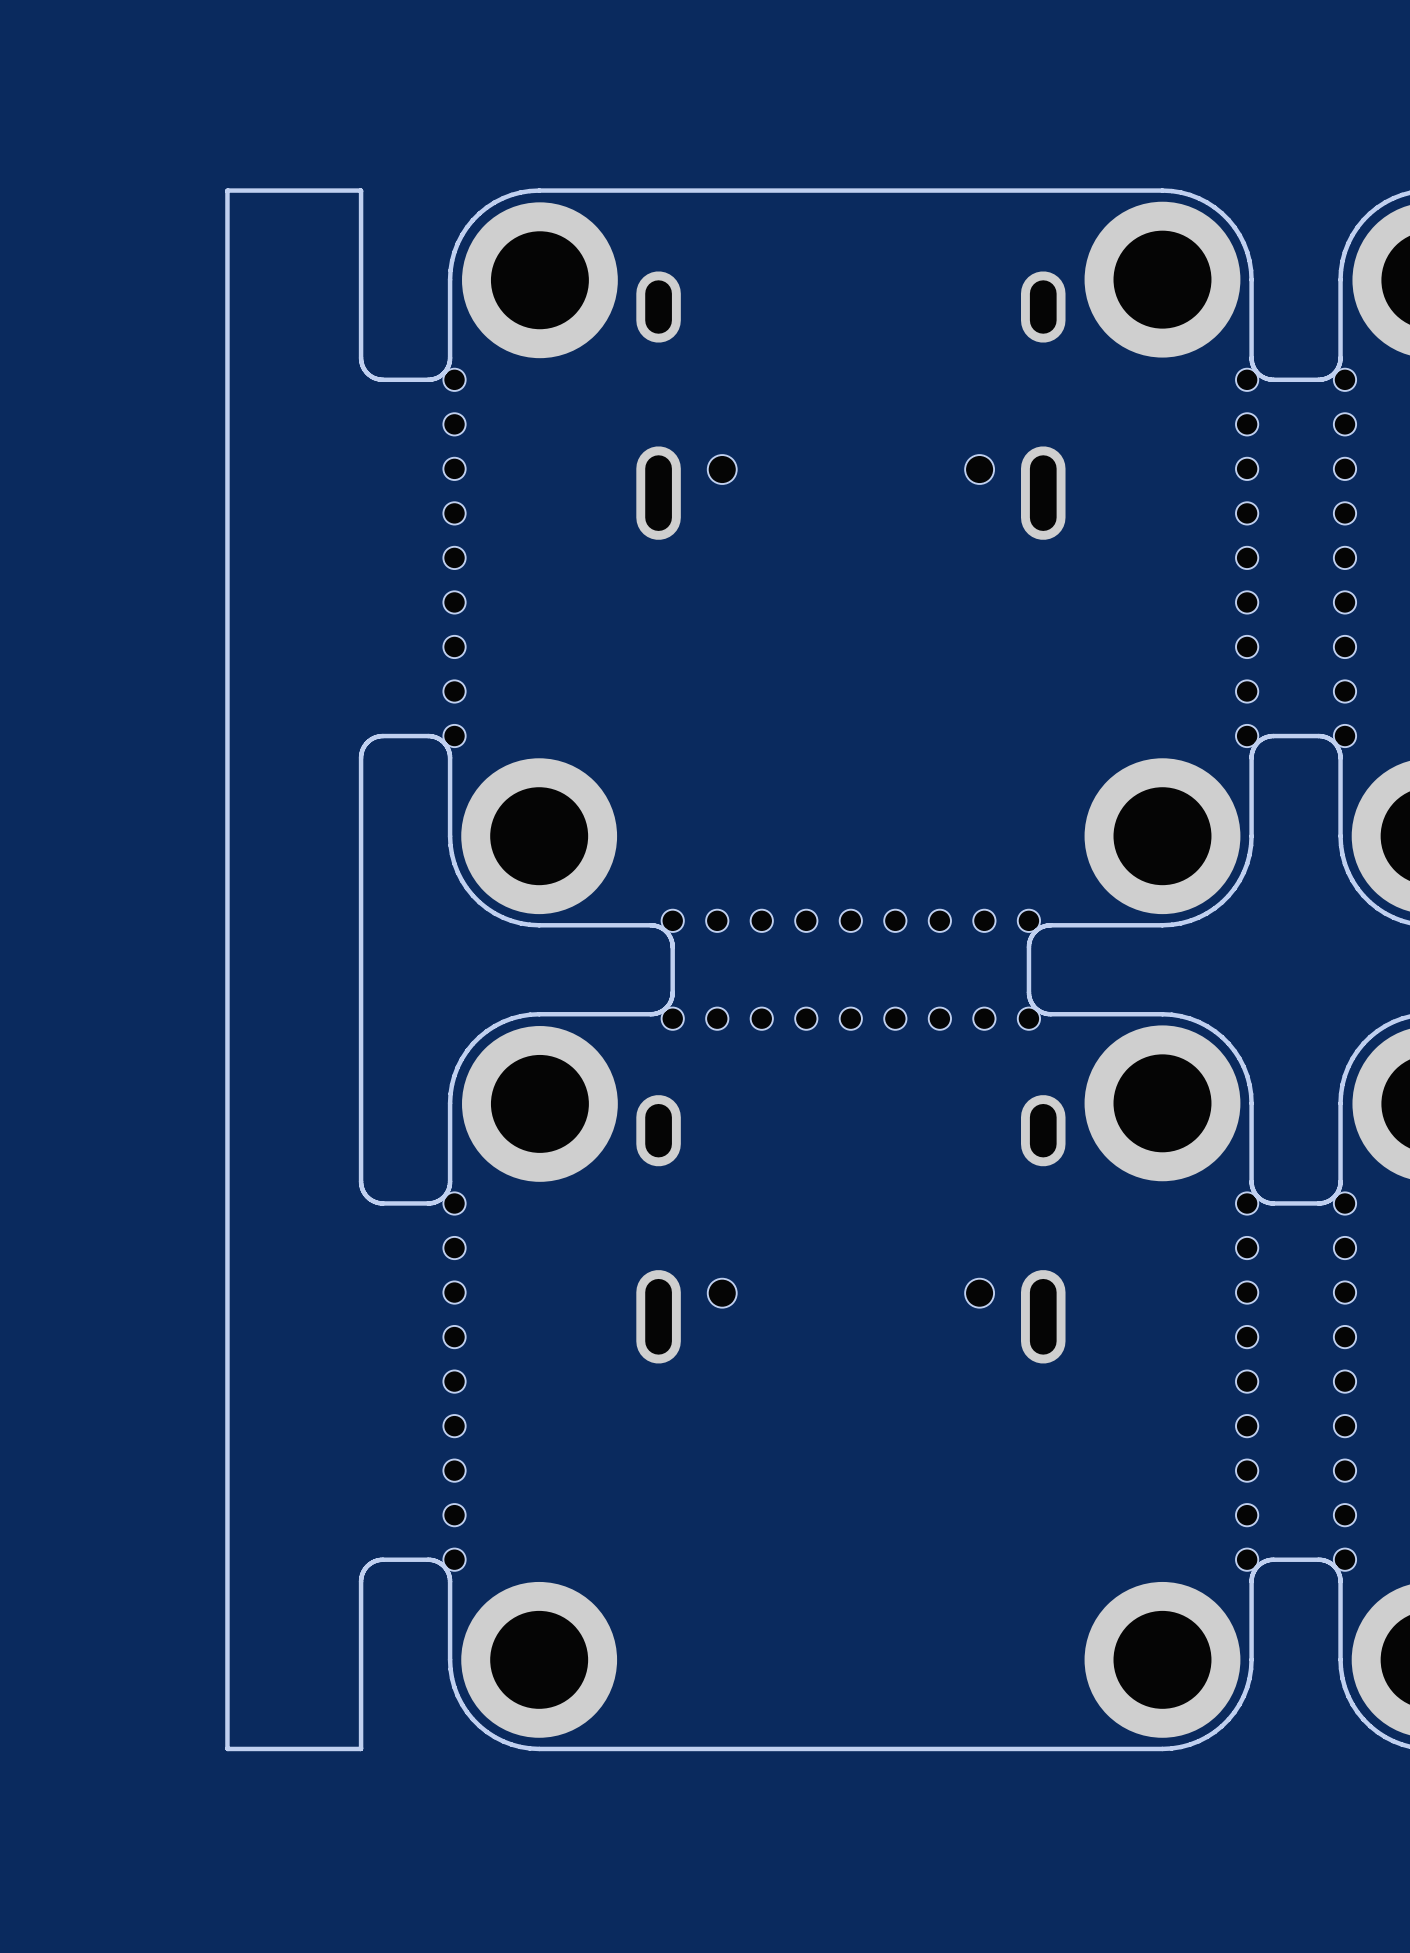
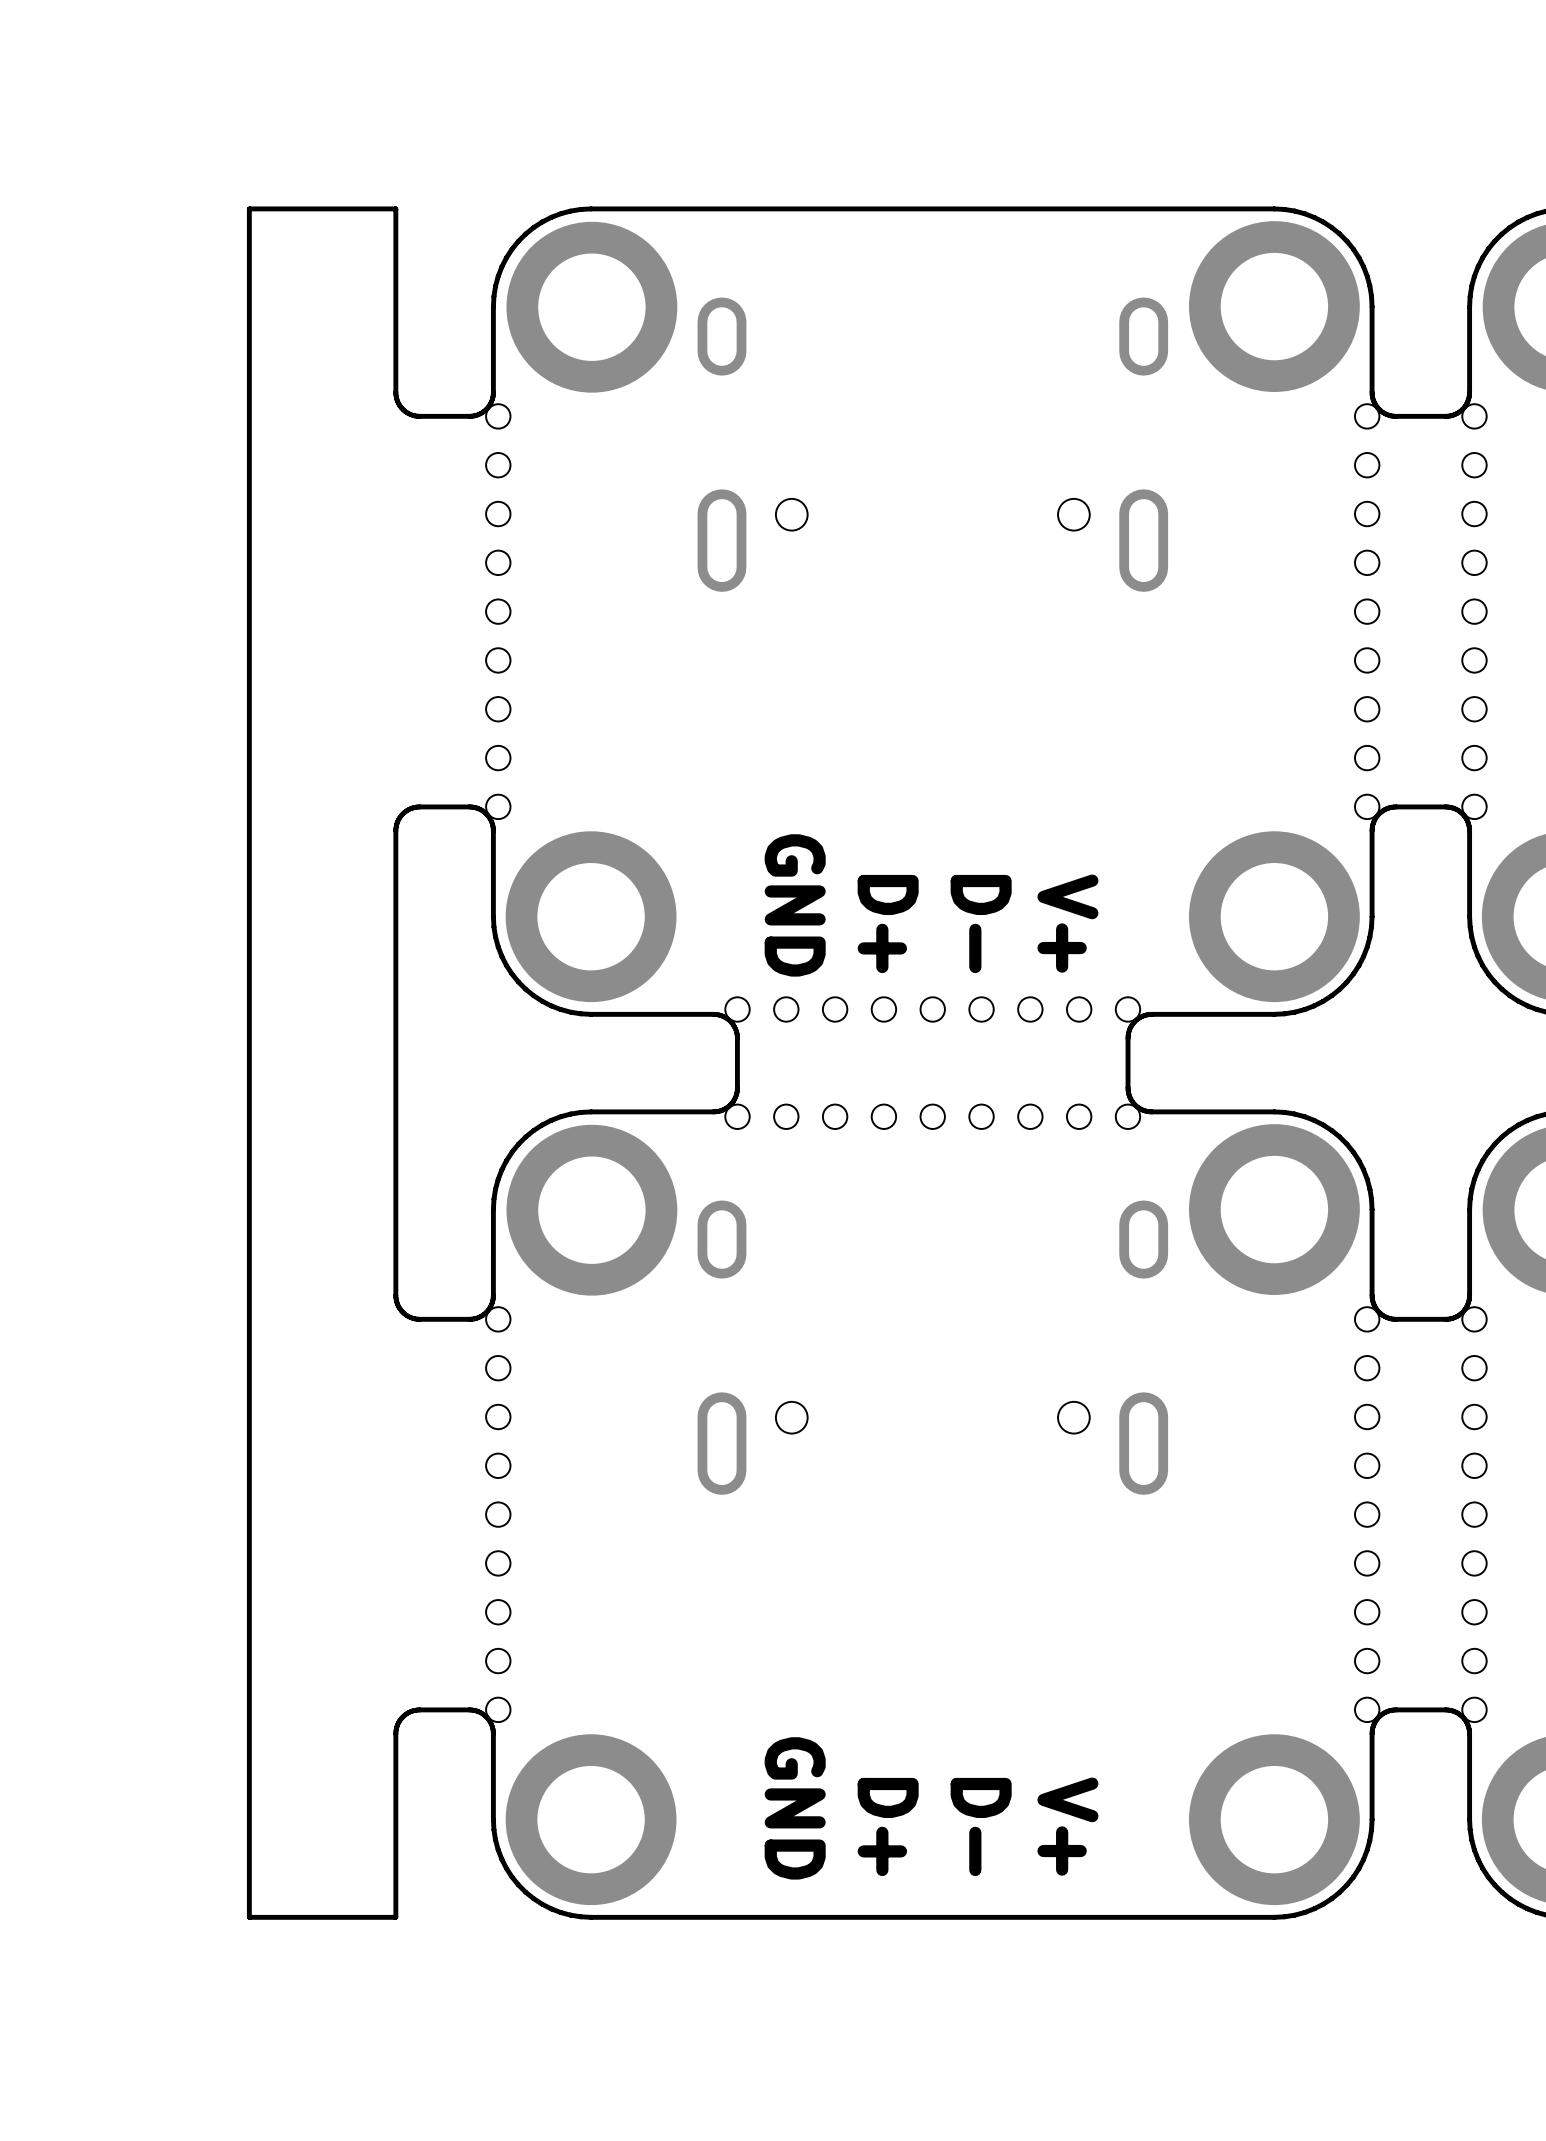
text: none -> GND (795, 905)
text: none -> D- (981, 924)
text: none -> D+ (888, 924)
text: none -> V+ (1067, 923)
text: none -> GND (795, 1808)
text: none -> D- (981, 1827)
text: none -> D+ (888, 1827)
text: none -> V+ (1067, 1826)

